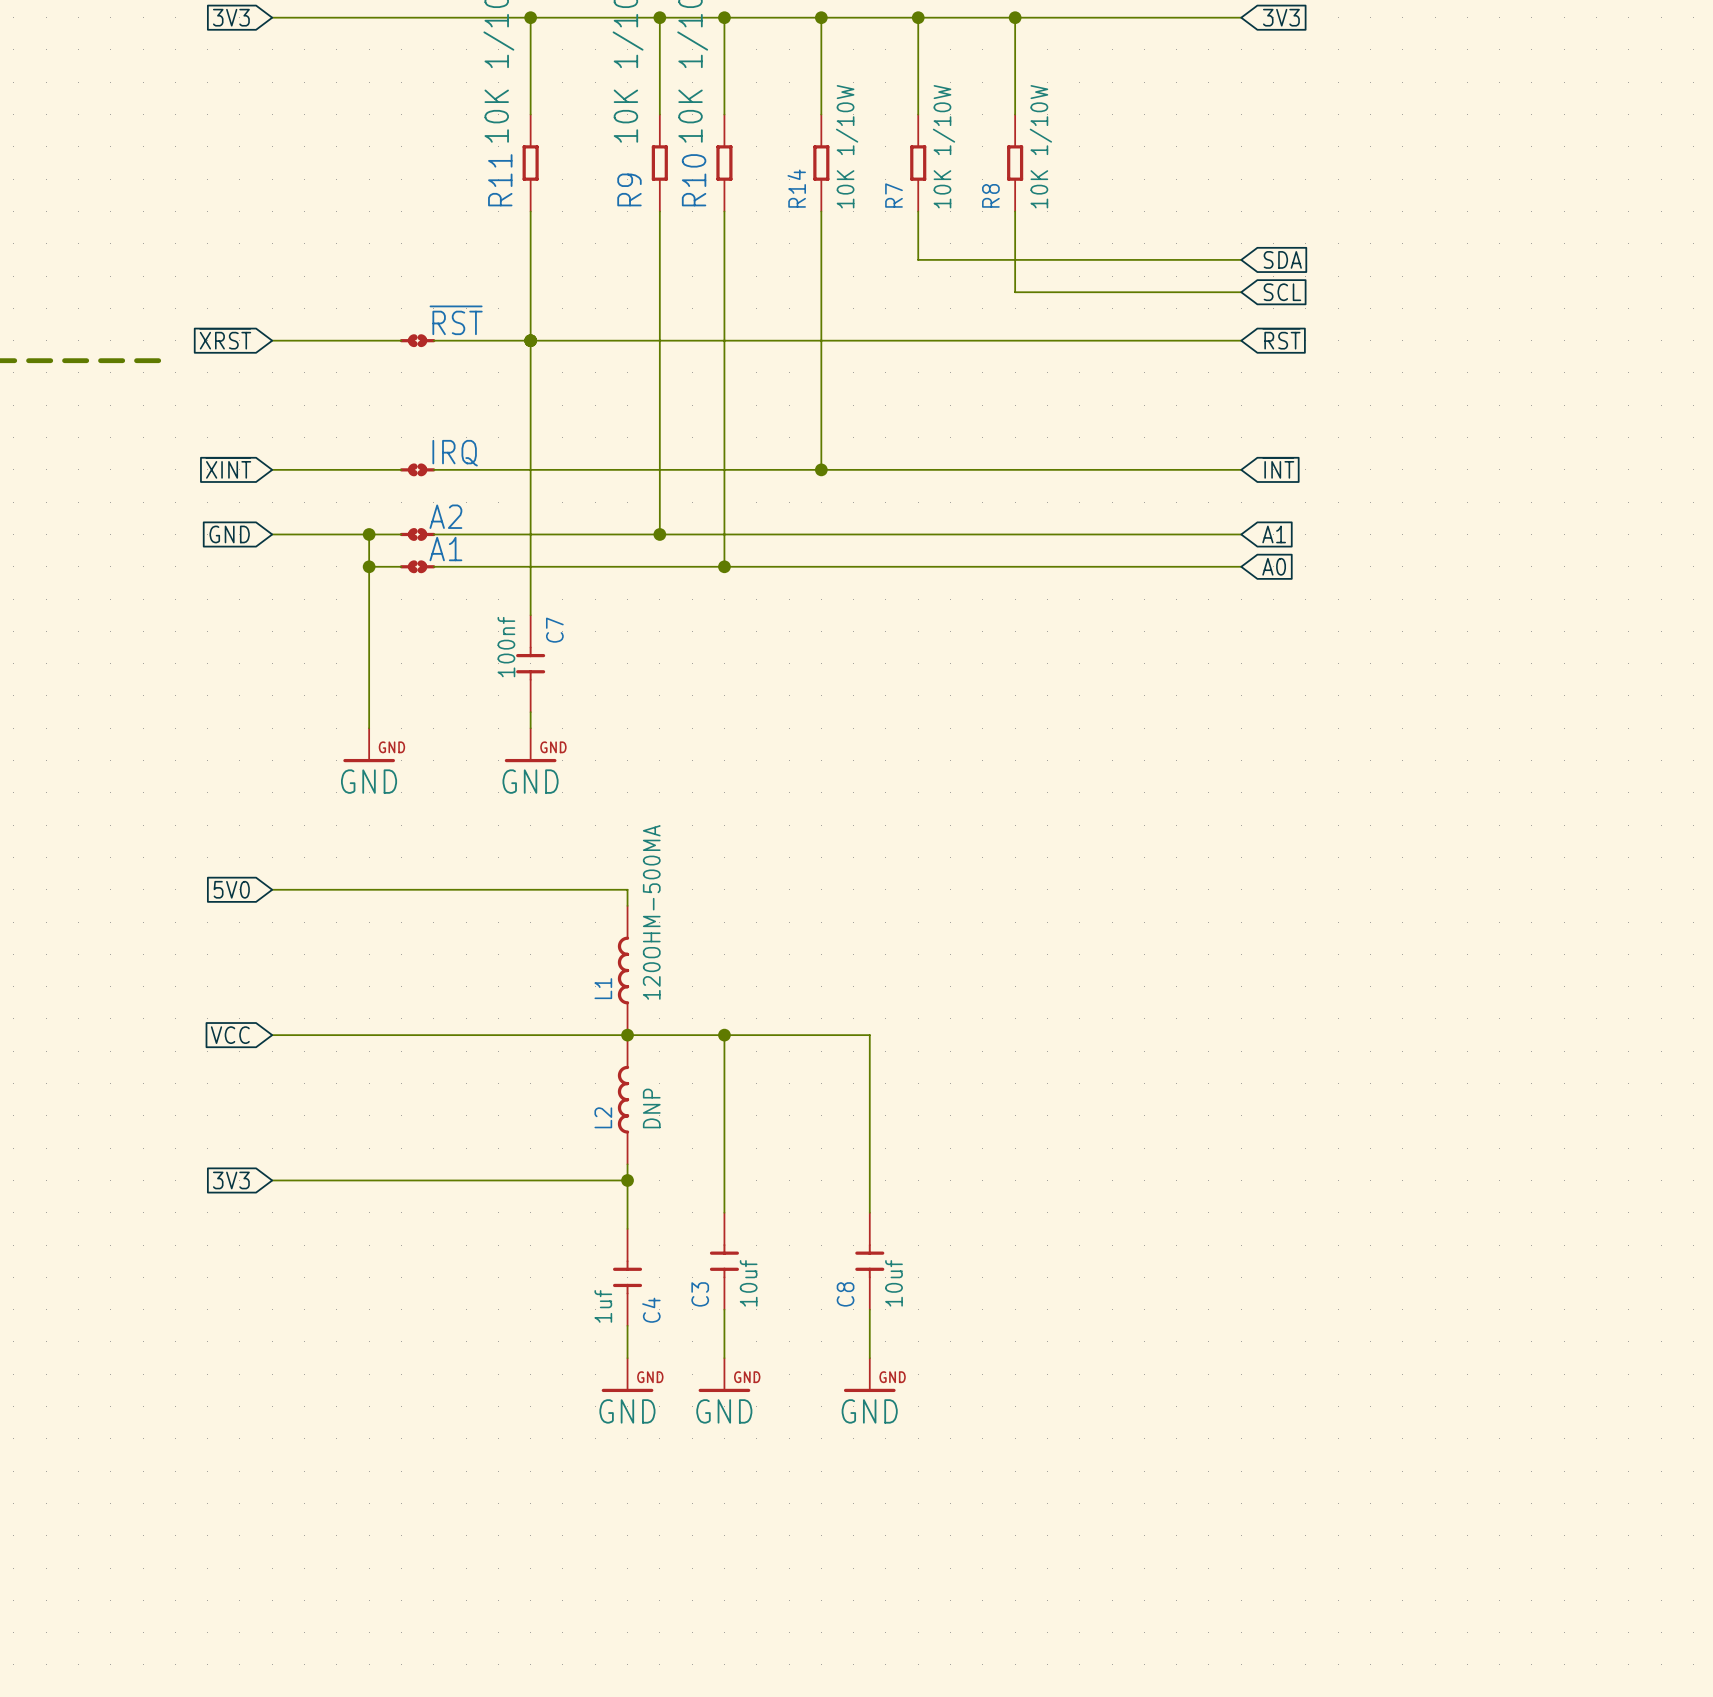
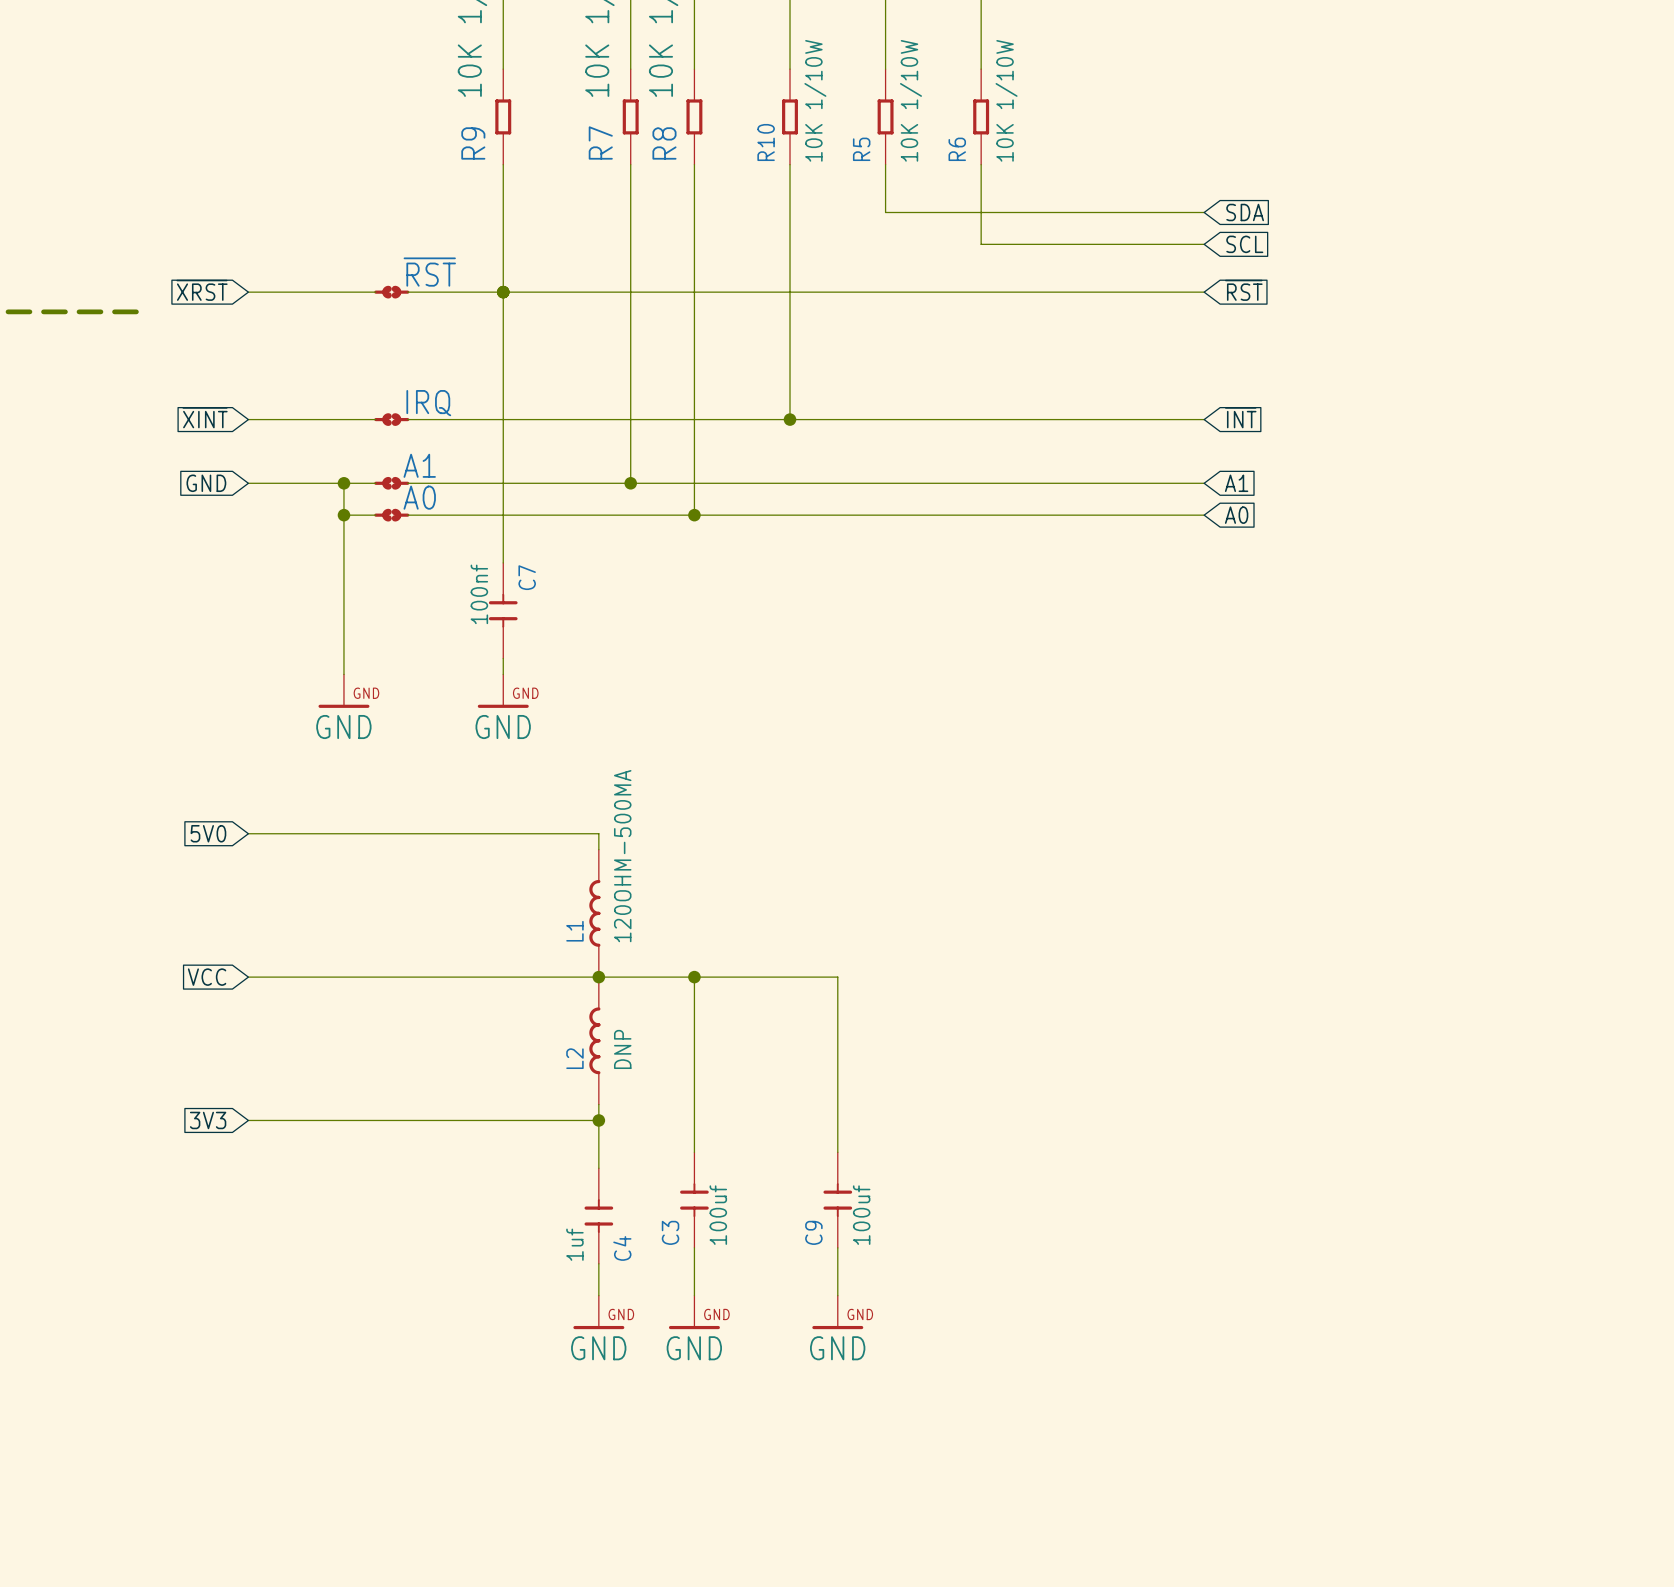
R11 name: R11 (500, 180) -> R9 (473, 143)
R10 name: R10 (694, 180) -> R8 (664, 143)
R14 name: R14 (796, 188) -> R10 (766, 142)
R9 name: R9 (629, 189) -> R7 (600, 142)
R7 name: R7 (894, 195) -> R5 (861, 149)
R8 name: R8 (990, 195) -> R6 (957, 149)
A2 name: A2 (445, 516) -> A1 (419, 465)
A1 name: A1 (445, 549) -> A0 (419, 497)
C3 value: 10uf (748, 1283) -> 100uf (718, 1215)
C8 value: 10uf (894, 1283) -> 100uf (861, 1215)
C8 name: C8 (845, 1294) -> C9 (813, 1232)

